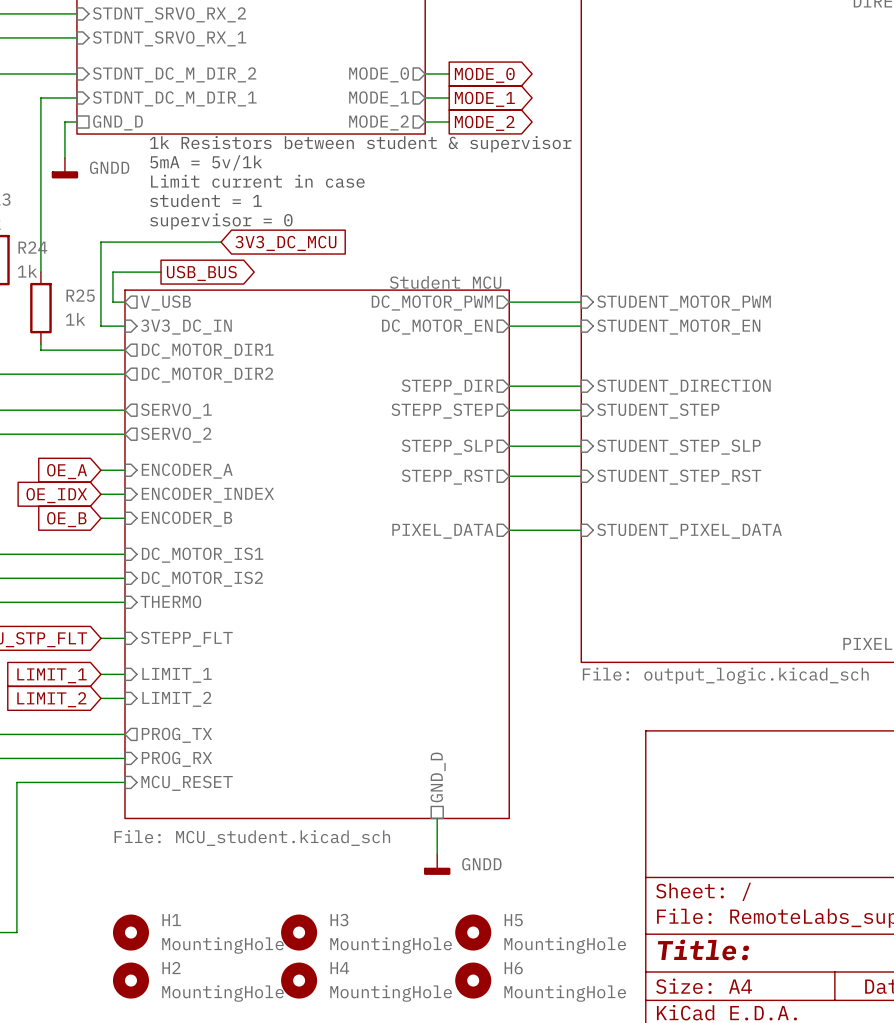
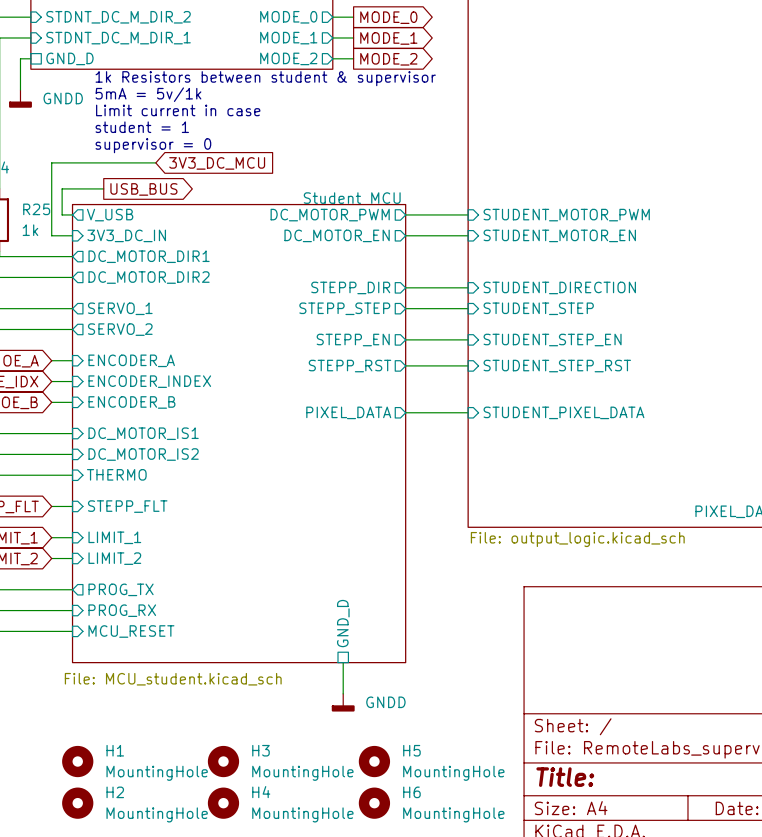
sheet pin: STEPP_SLP (447, 447) -> STEPP_EN (353, 340)
sheet pin: STUDENT_STEP_SLP (679, 447) -> STUDENT_STEP_EN (552, 340)

